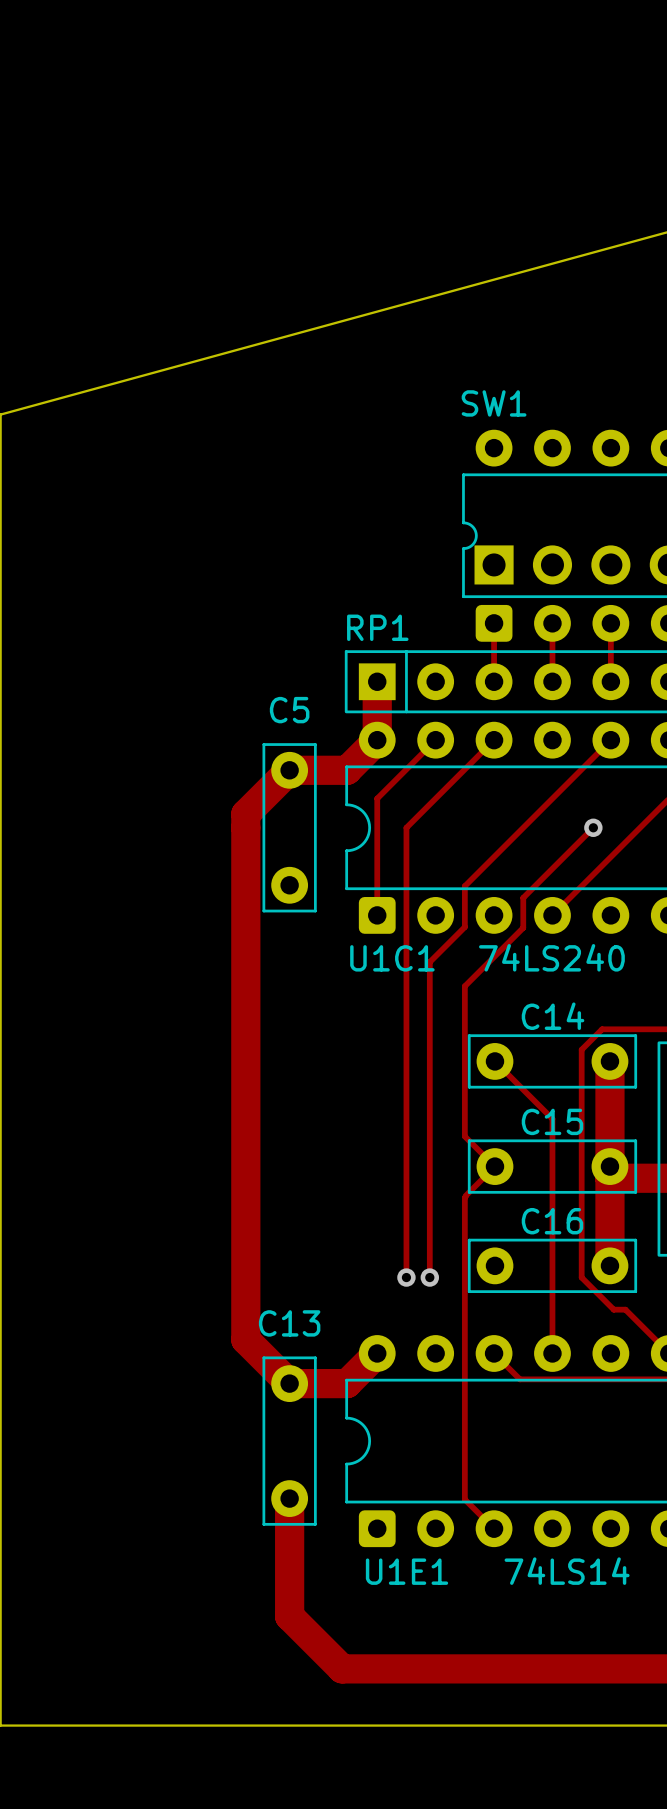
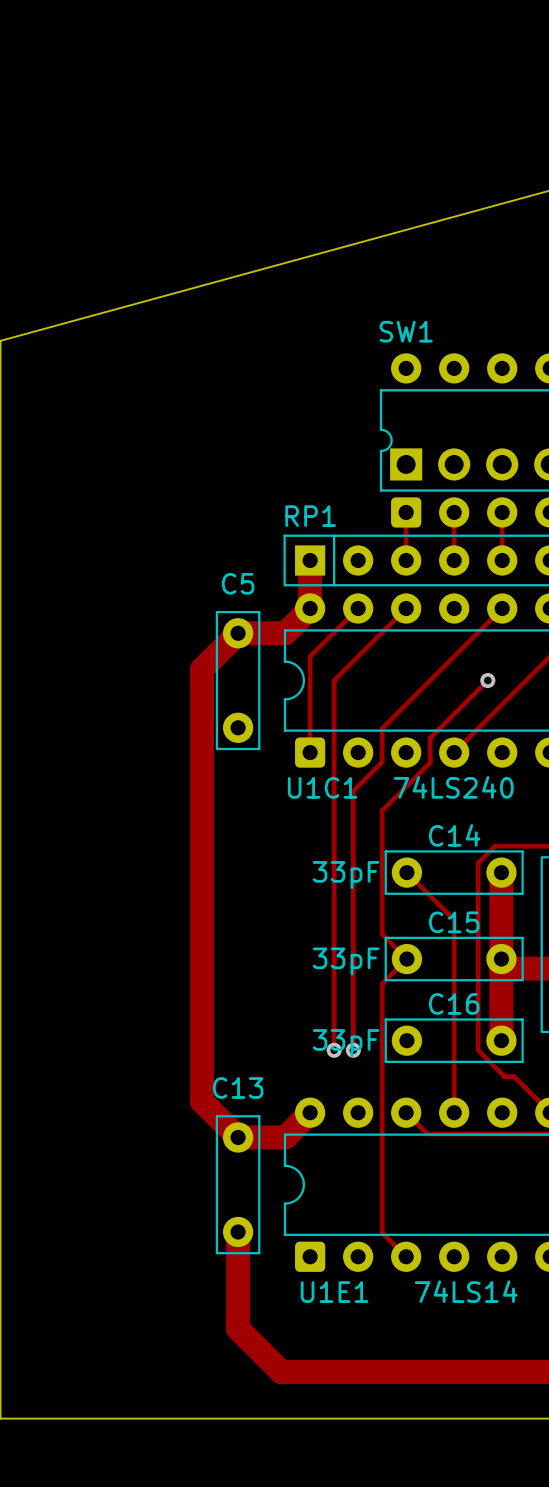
C14 value: none -> 33pF (346, 875)
C15 value: none -> 33pF (346, 961)
C16 value: none -> 33pF (346, 1043)

